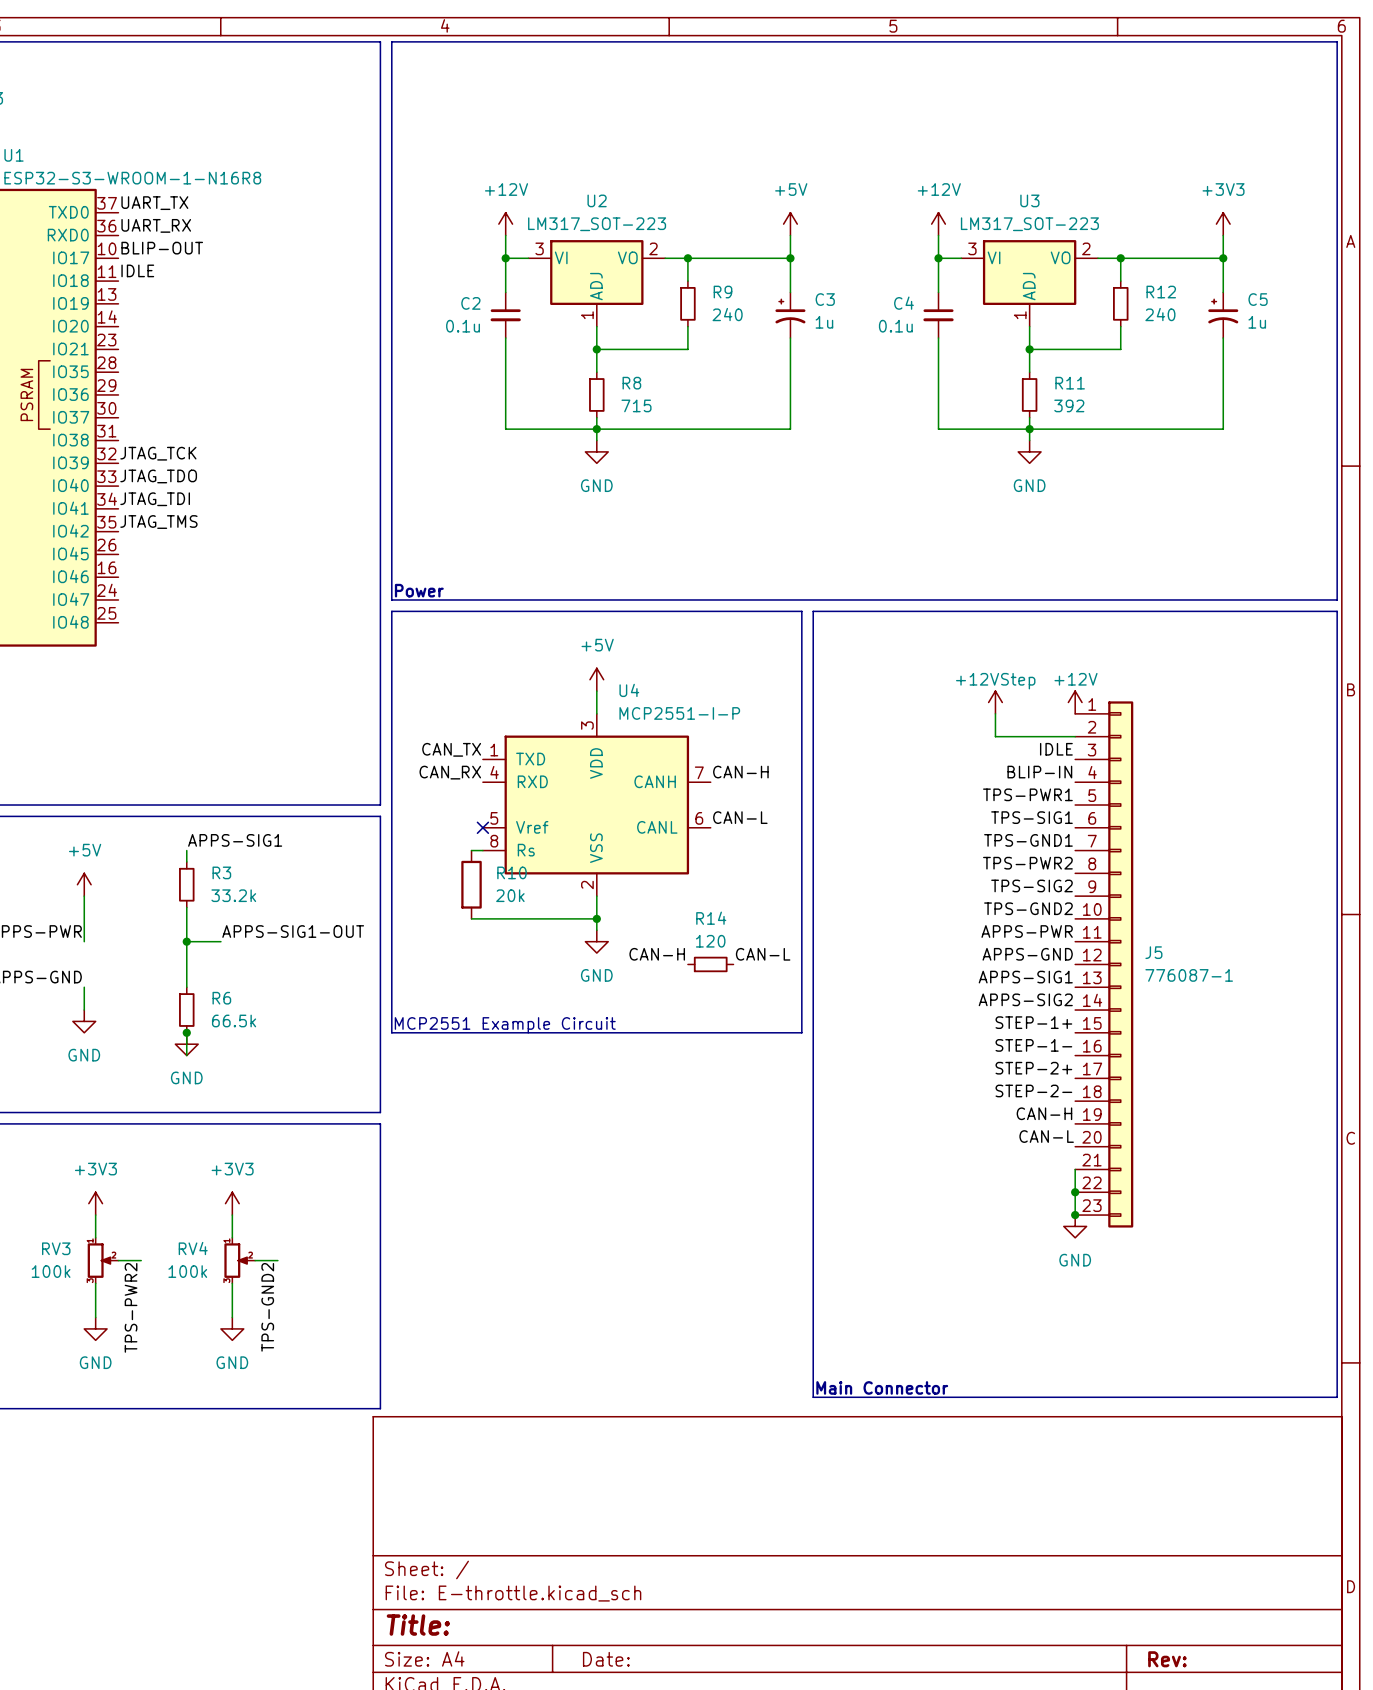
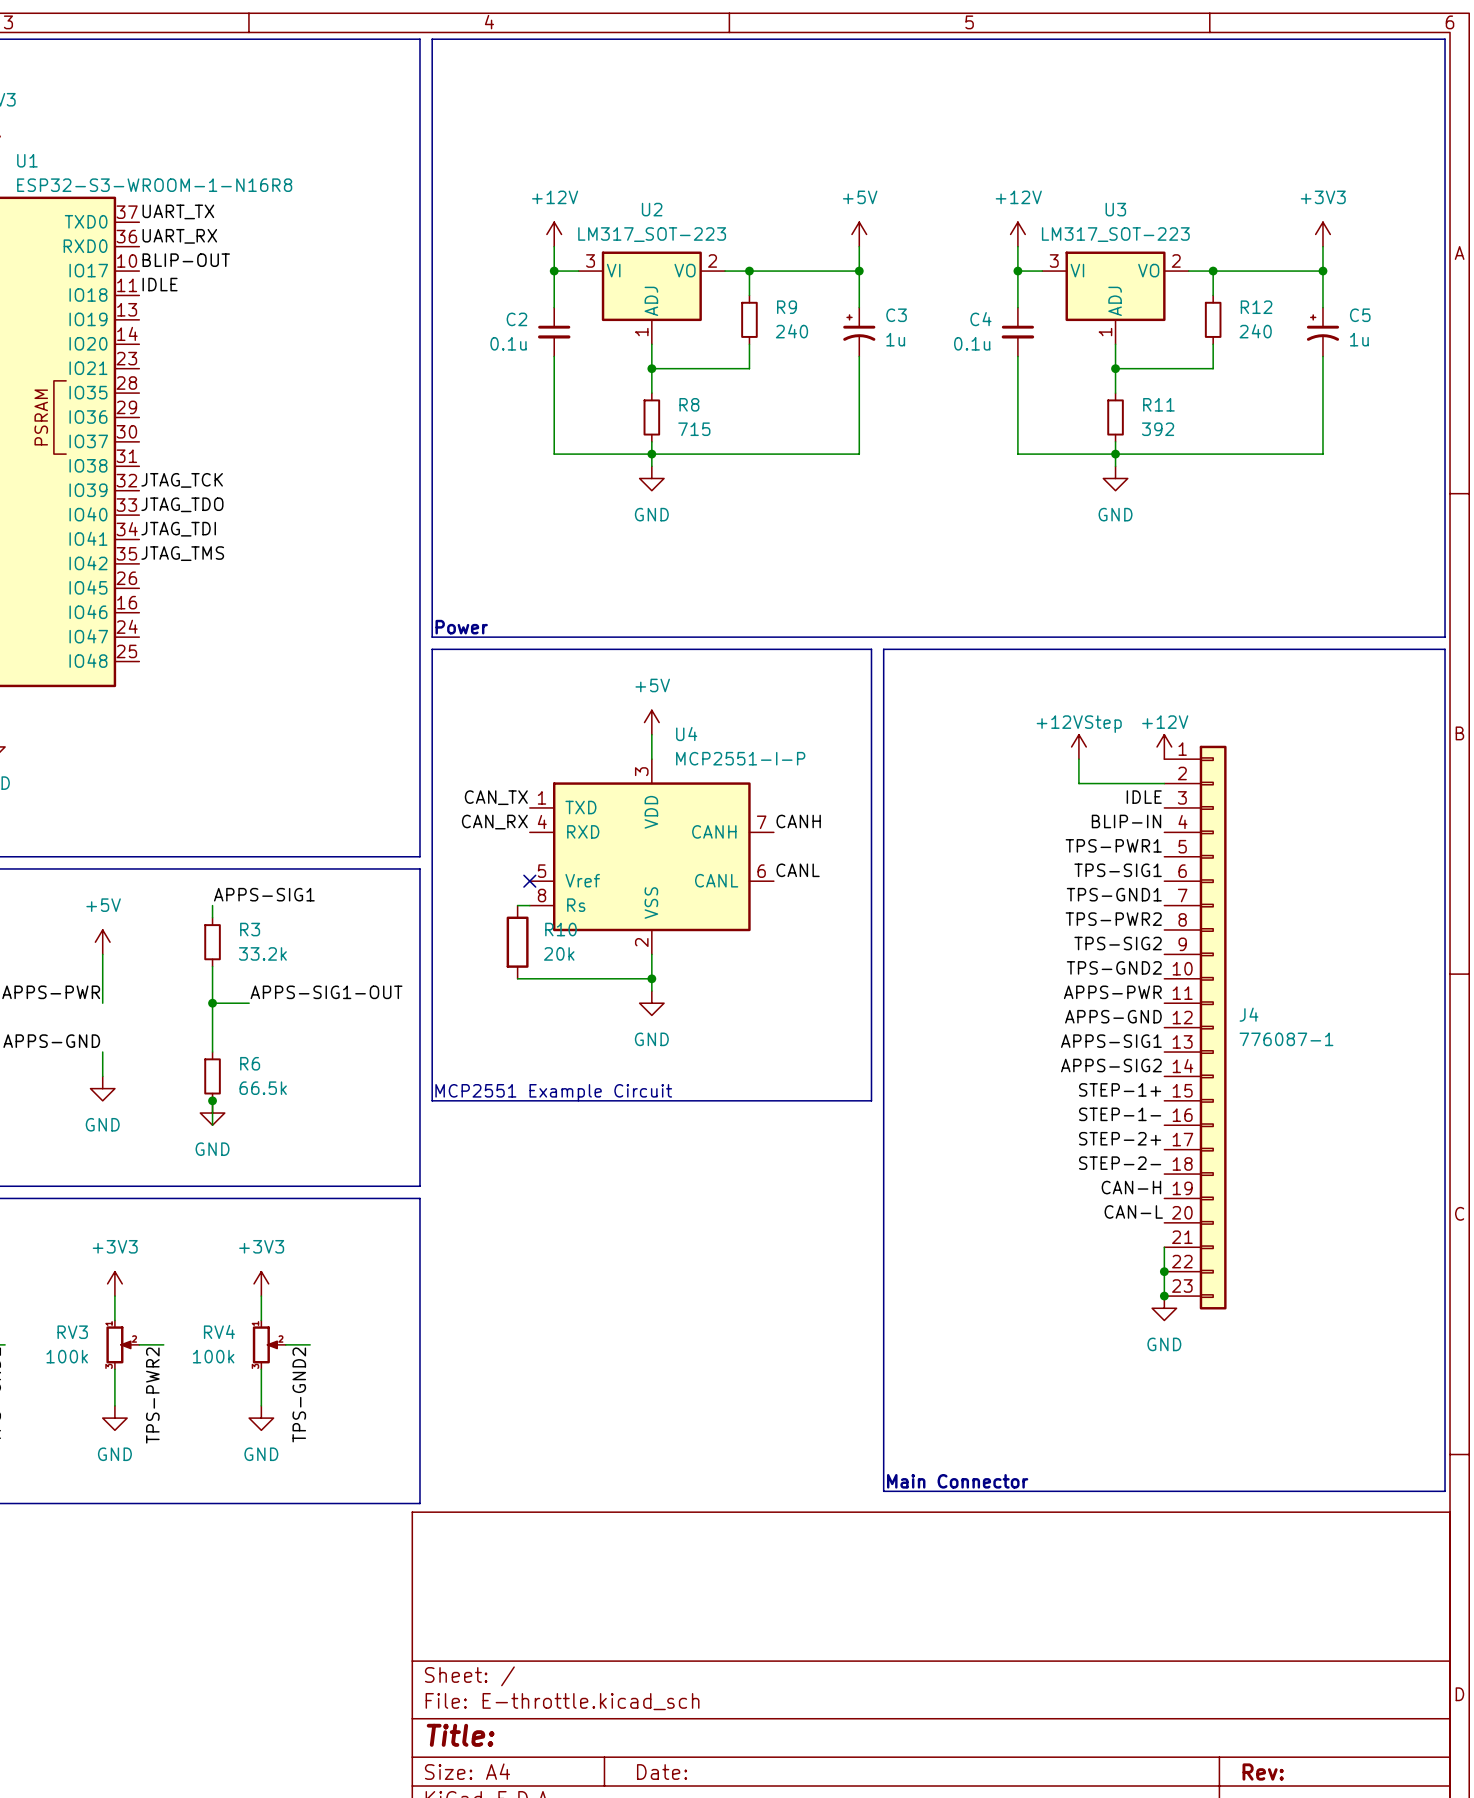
label: CAN-H (740, 772) -> CANH (798, 821)
label: CAN-L (740, 817) -> CANL (798, 870)
J5 name: J5 (1153, 952) -> J4 (1248, 1014)
label: CAN-H (657, 954) -> none
label: CAN-L (763, 954) -> none
R14: 120 (710, 964) -> none

